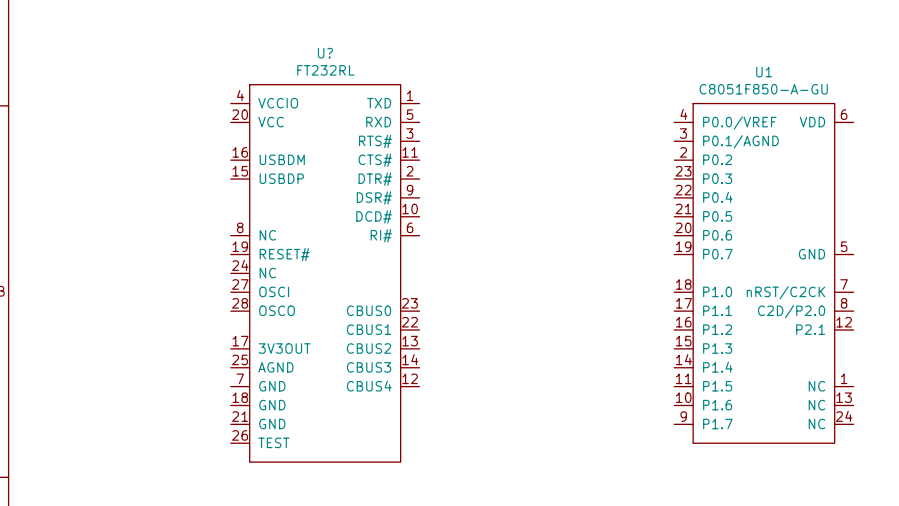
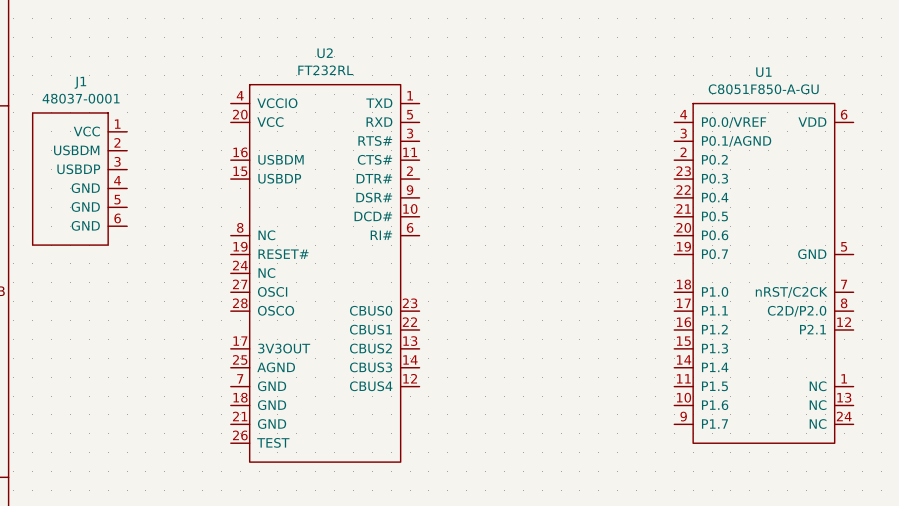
U? name: U? (325, 53) -> U2 (325, 53)
J1: none -> 48037-0001 (79, 179)

